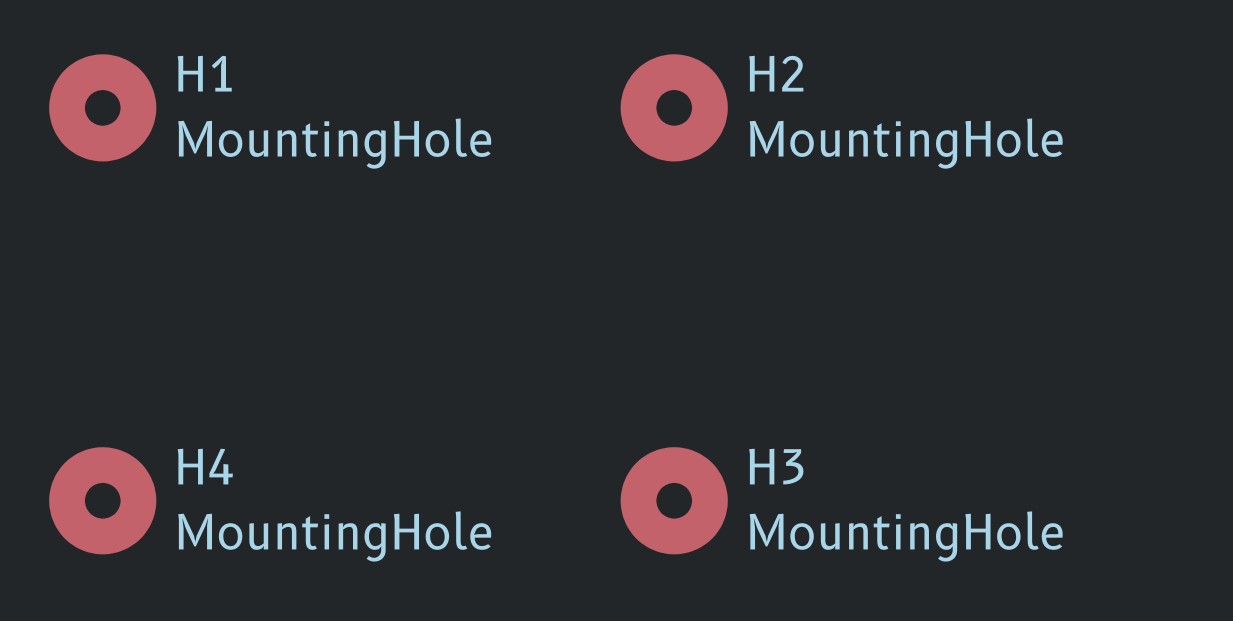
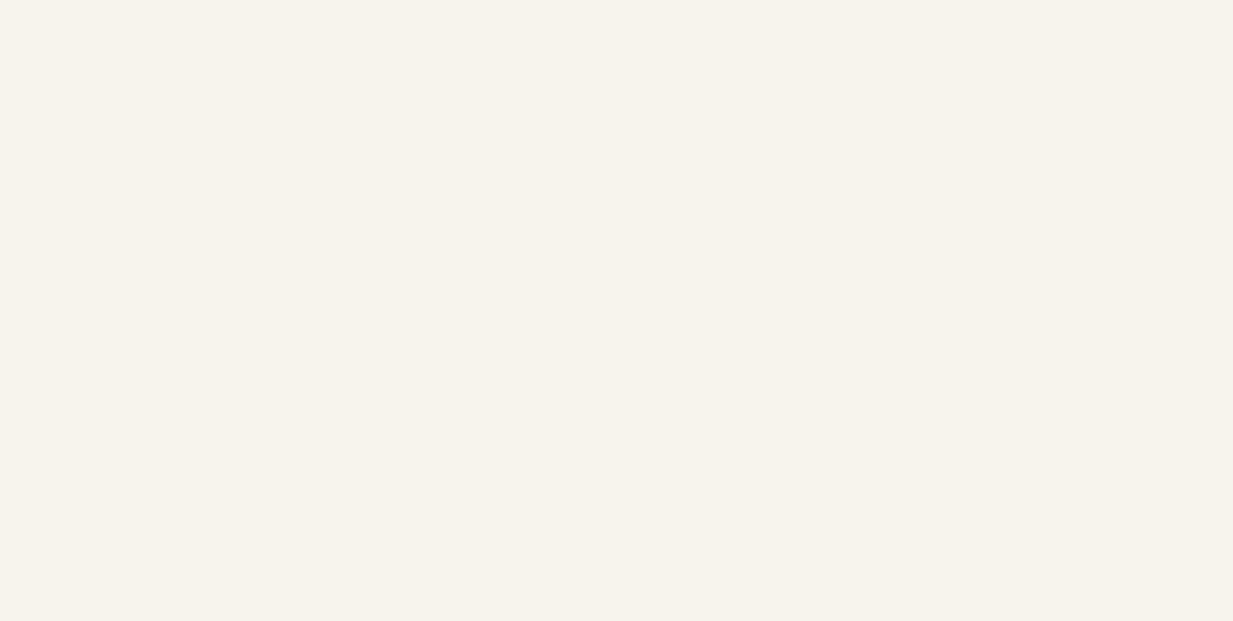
H1: MountingHole (102, 107) -> none
H2: MountingHole (674, 107) -> none
H4: MountingHole (102, 500) -> none
H3: MountingHole (674, 500) -> none

